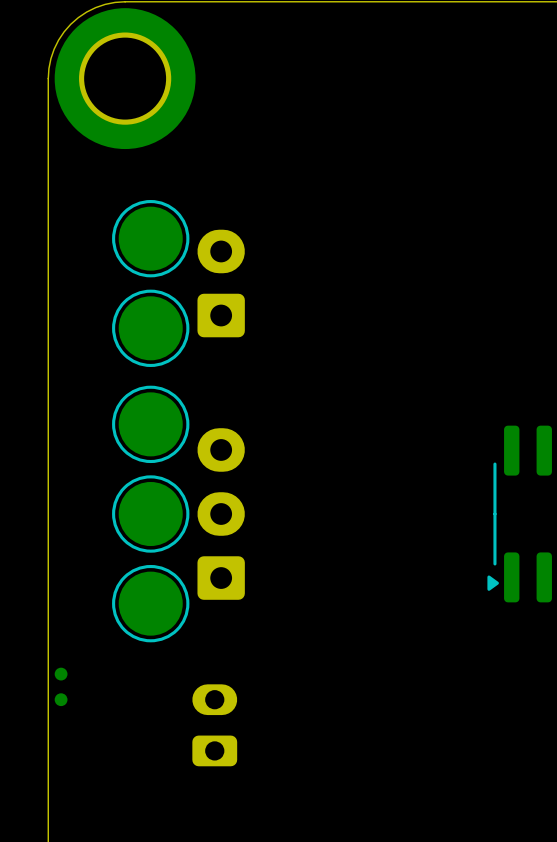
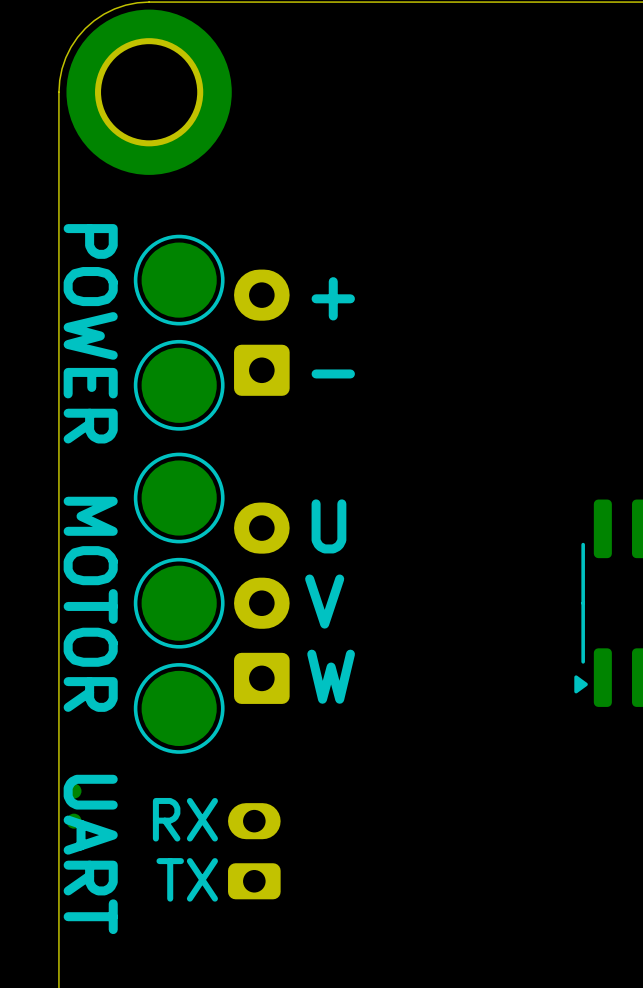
text: none -> + (333, 298)
text: none -> POWER (90, 333)
text: none -> - (333, 373)
text: none -> U (328, 526)
text: none -> V (324, 601)
text: none -> MOTOR (90, 604)
text: none -> W (331, 676)
text: none -> RX (185, 819)
text: none -> UART (90, 854)
text: none -> TX (187, 879)

